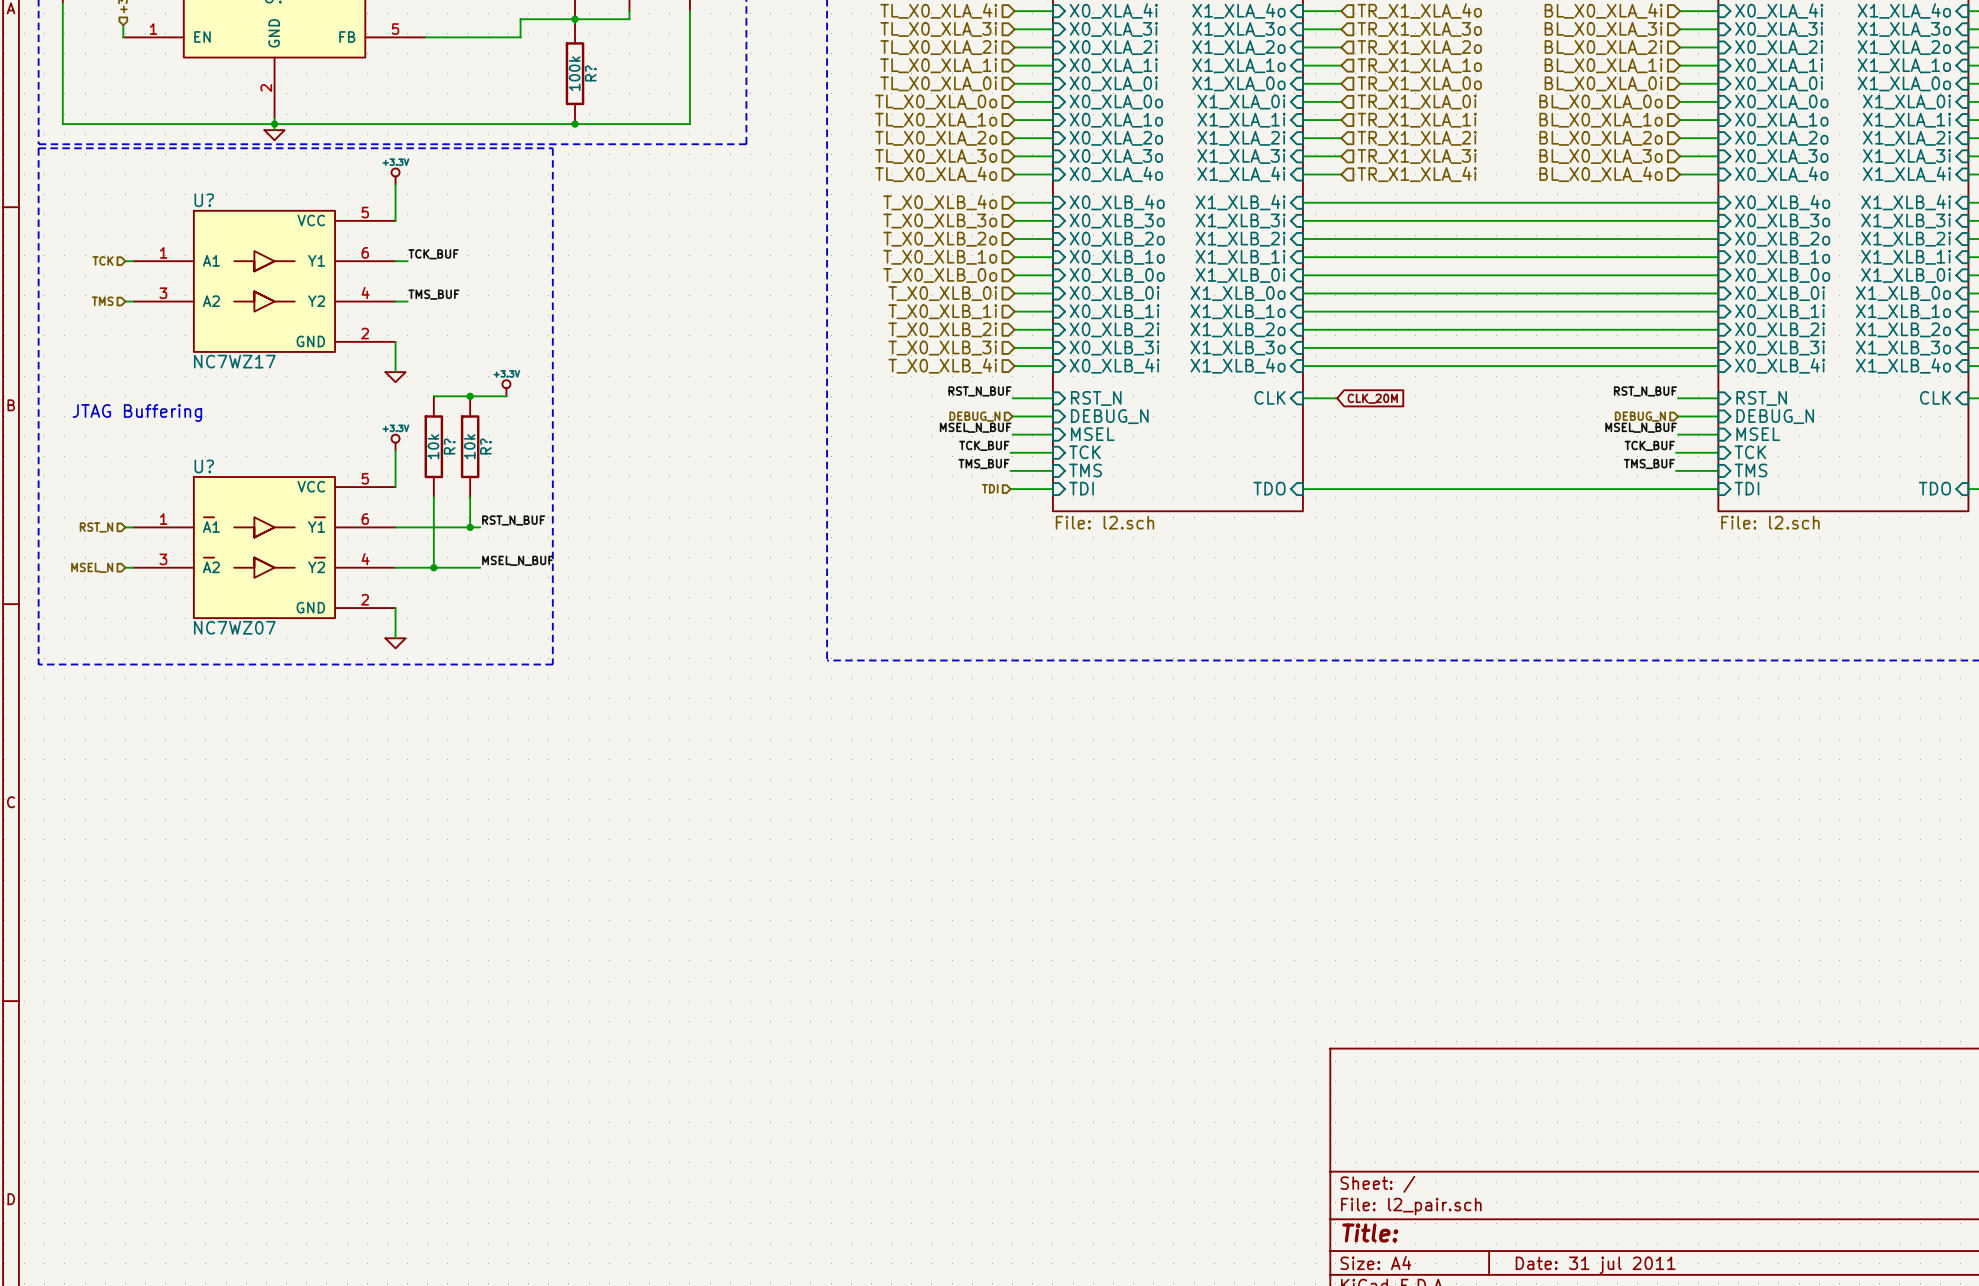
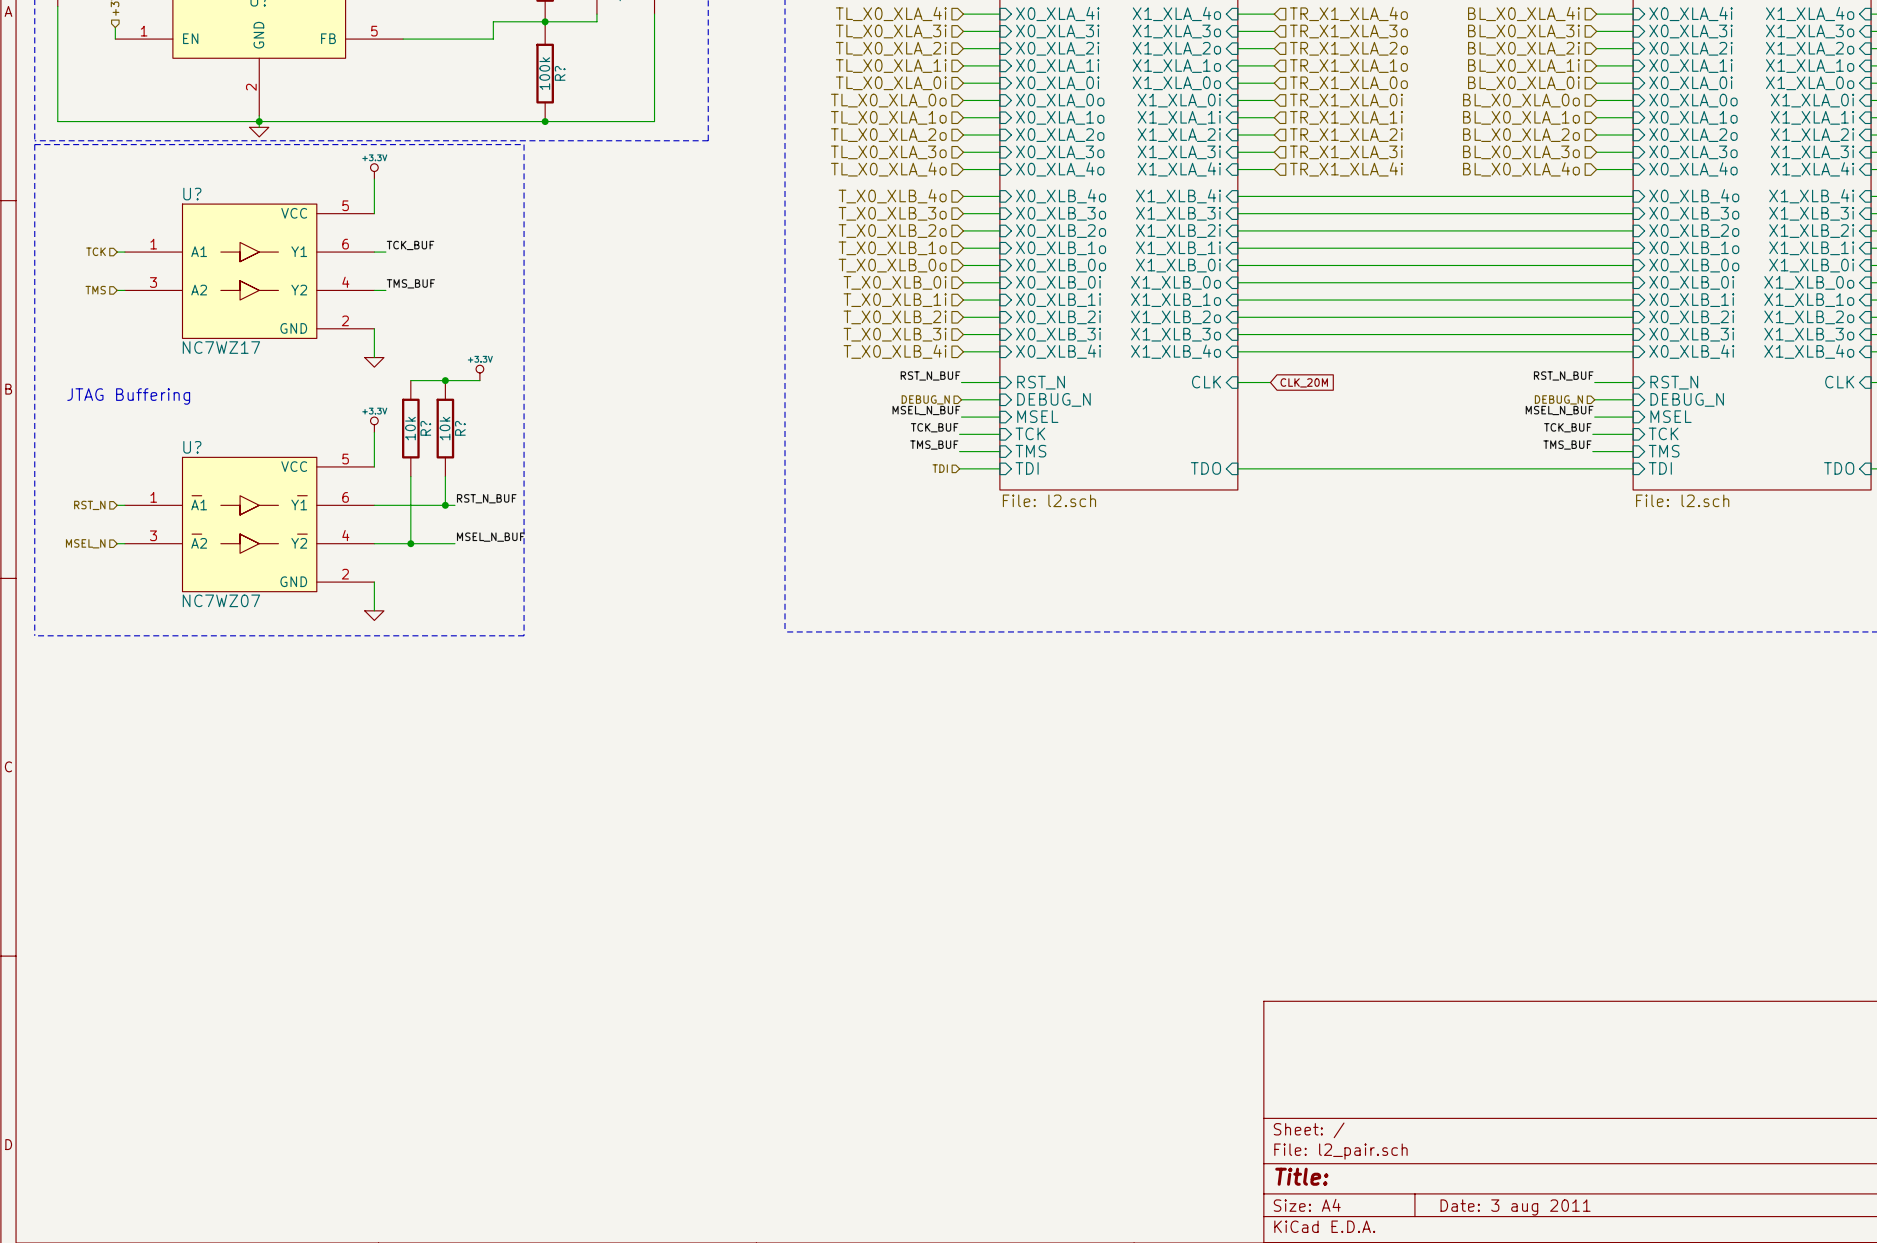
title block: Date: 31 jul 2011 (1595, 1265) -> Date: 3 aug 2011 (1515, 1207)

